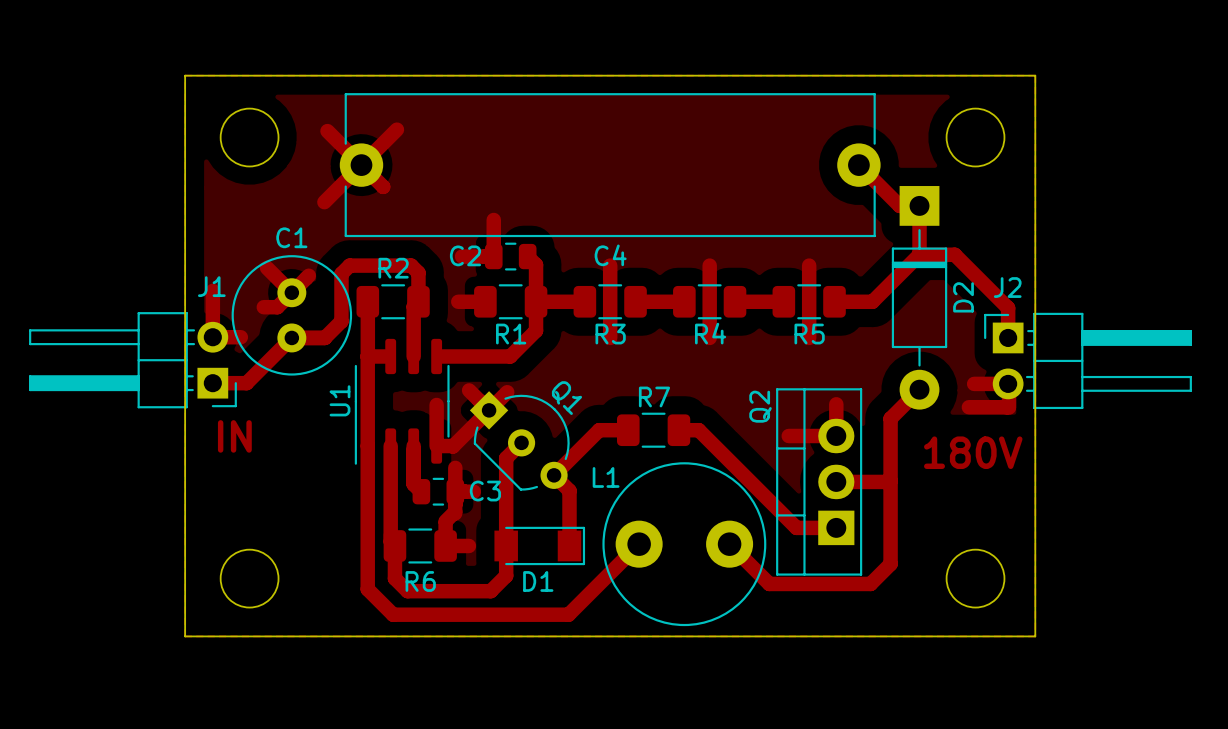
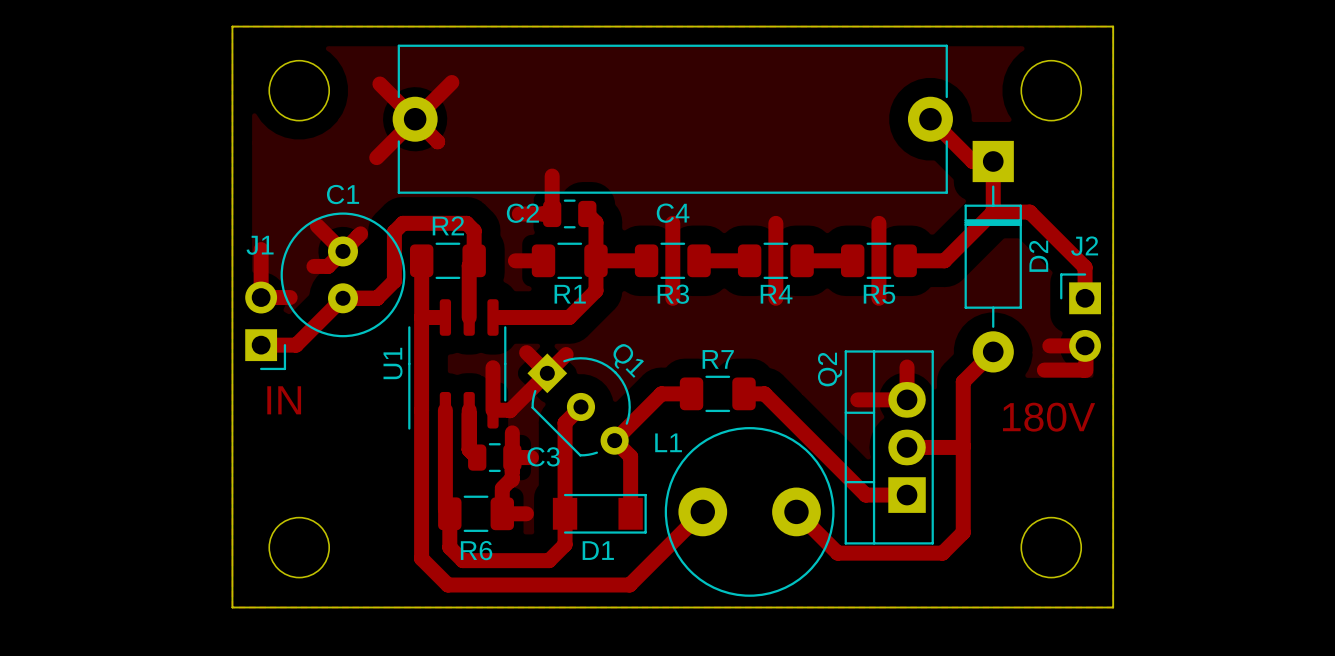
J1 footprint: [29, 312, 237, 409] -> [245, 281, 287, 371]
J2 footprint: [984, 312, 1192, 410] -> [1060, 273, 1101, 362]

